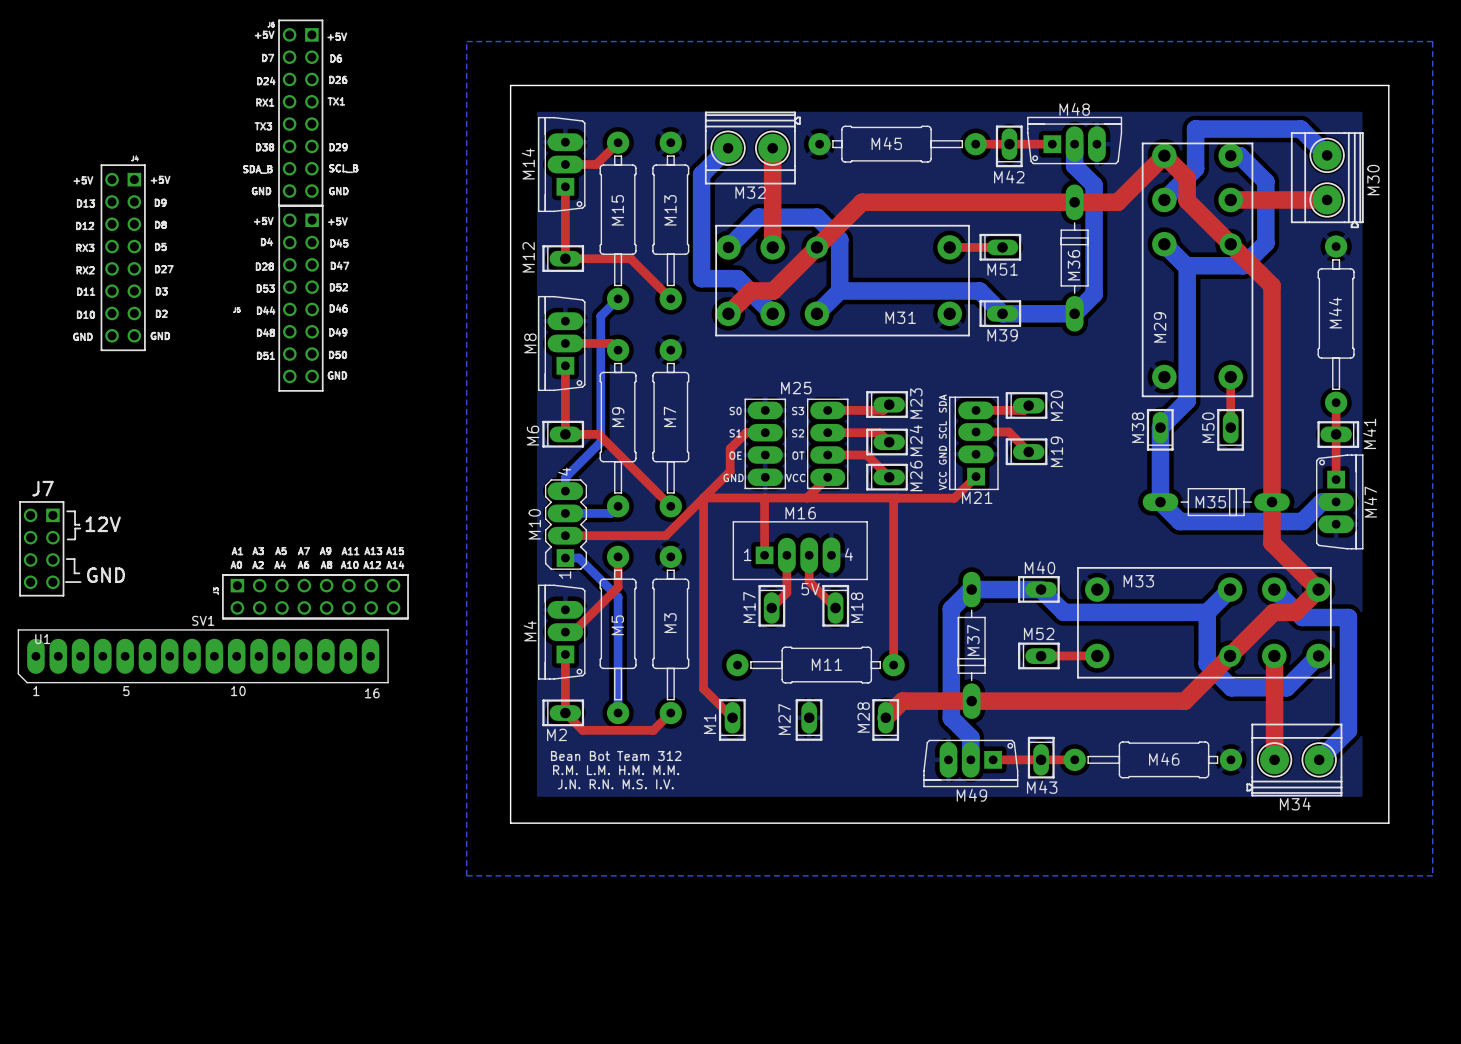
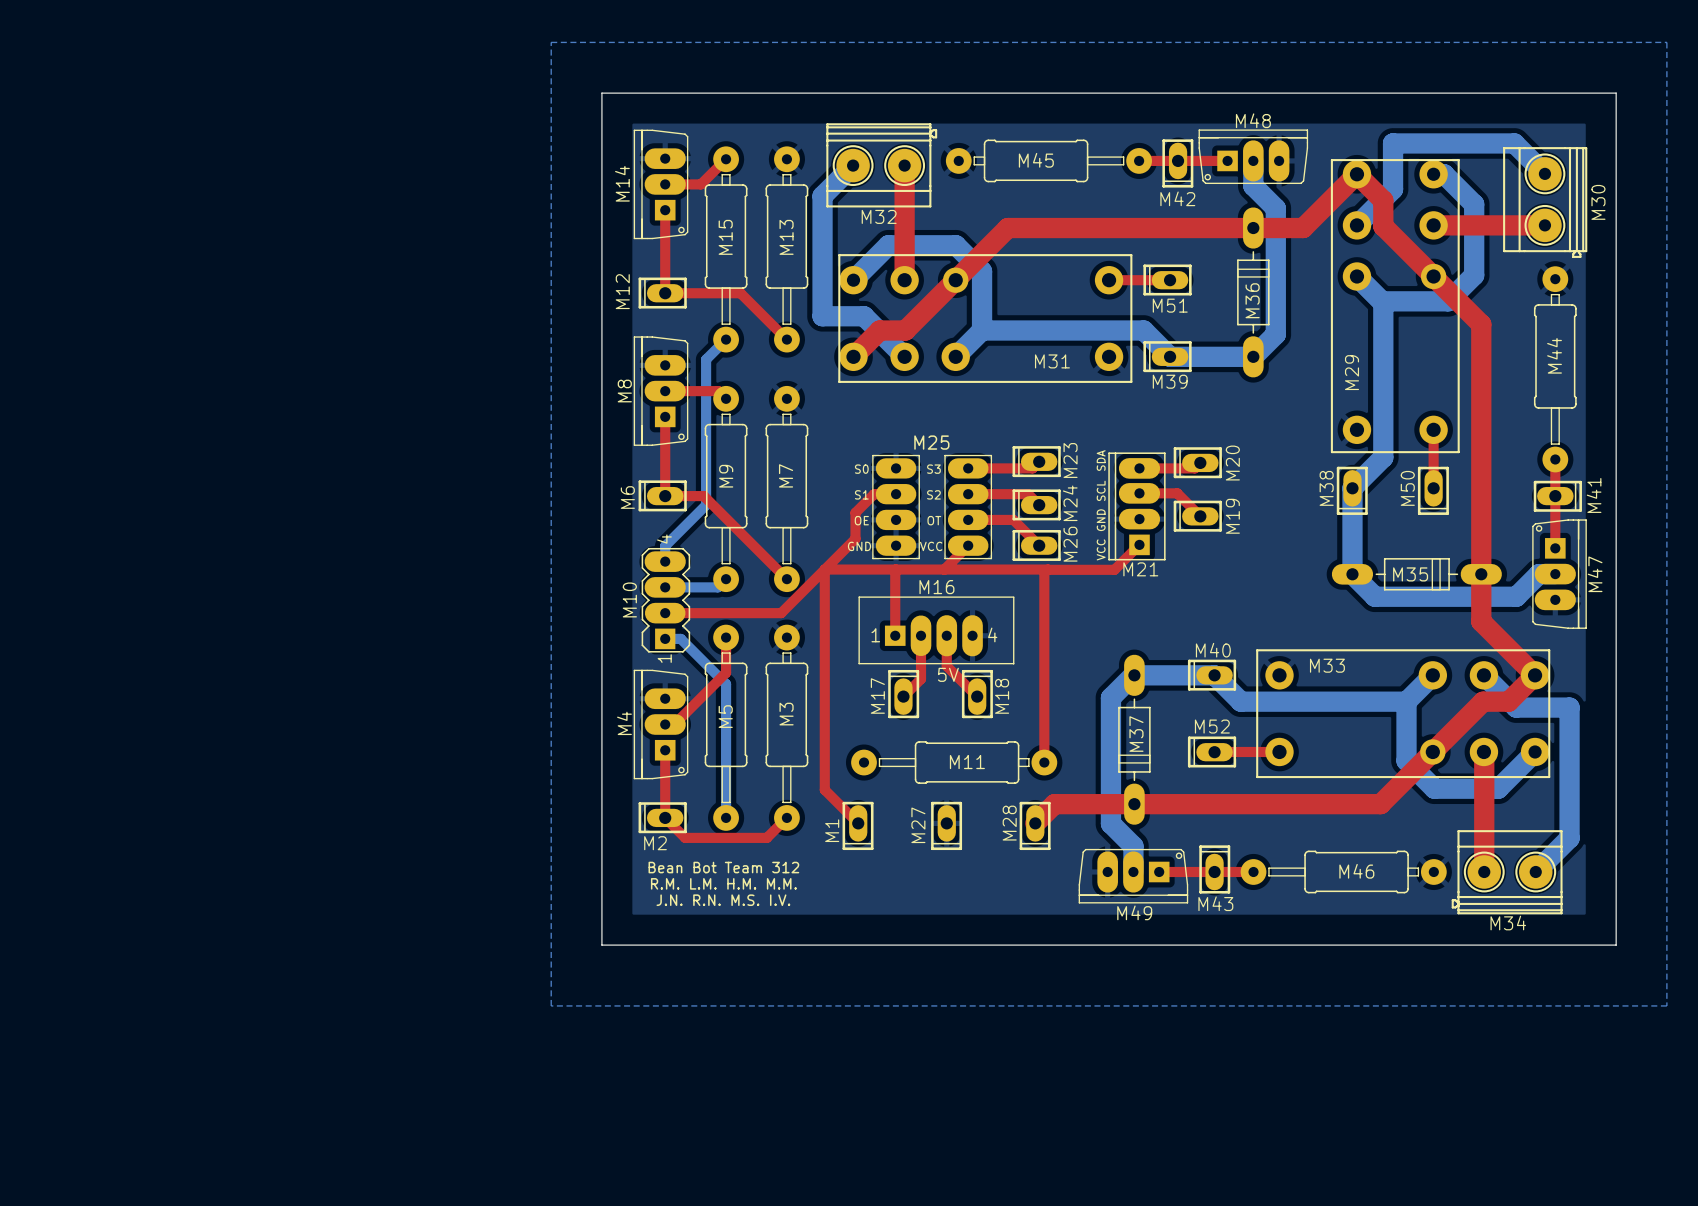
U1: (214, 319) -> none
SV1: (203, 656) -> none

